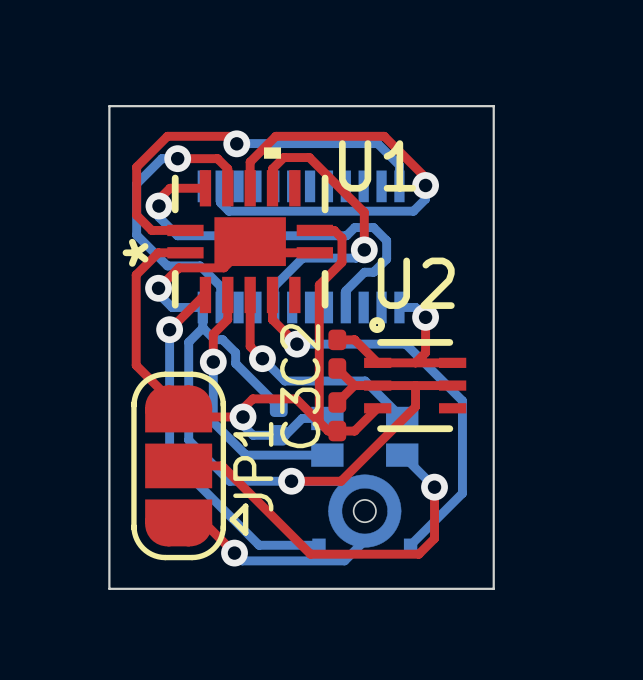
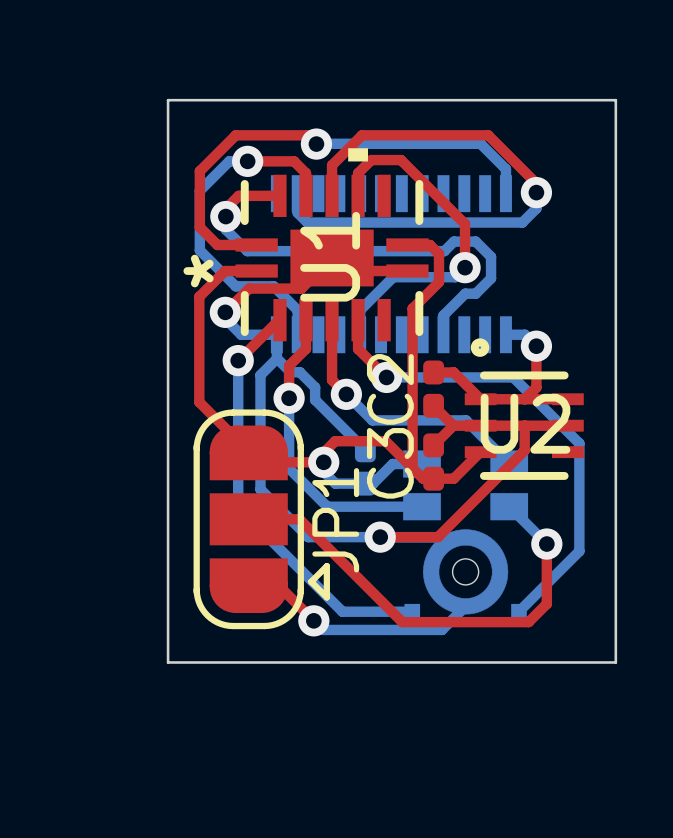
U1 name rotation: 0° (377, 165) -> 90° counterclockwise (330, 256)
U1 name position: U1 (377, 165) -> U1 (330, 256)
U2 name position: U2 (416, 283) -> U2 (525, 423)
U2 footprint: [364, 317, 467, 433] -> [464, 338, 584, 480]

